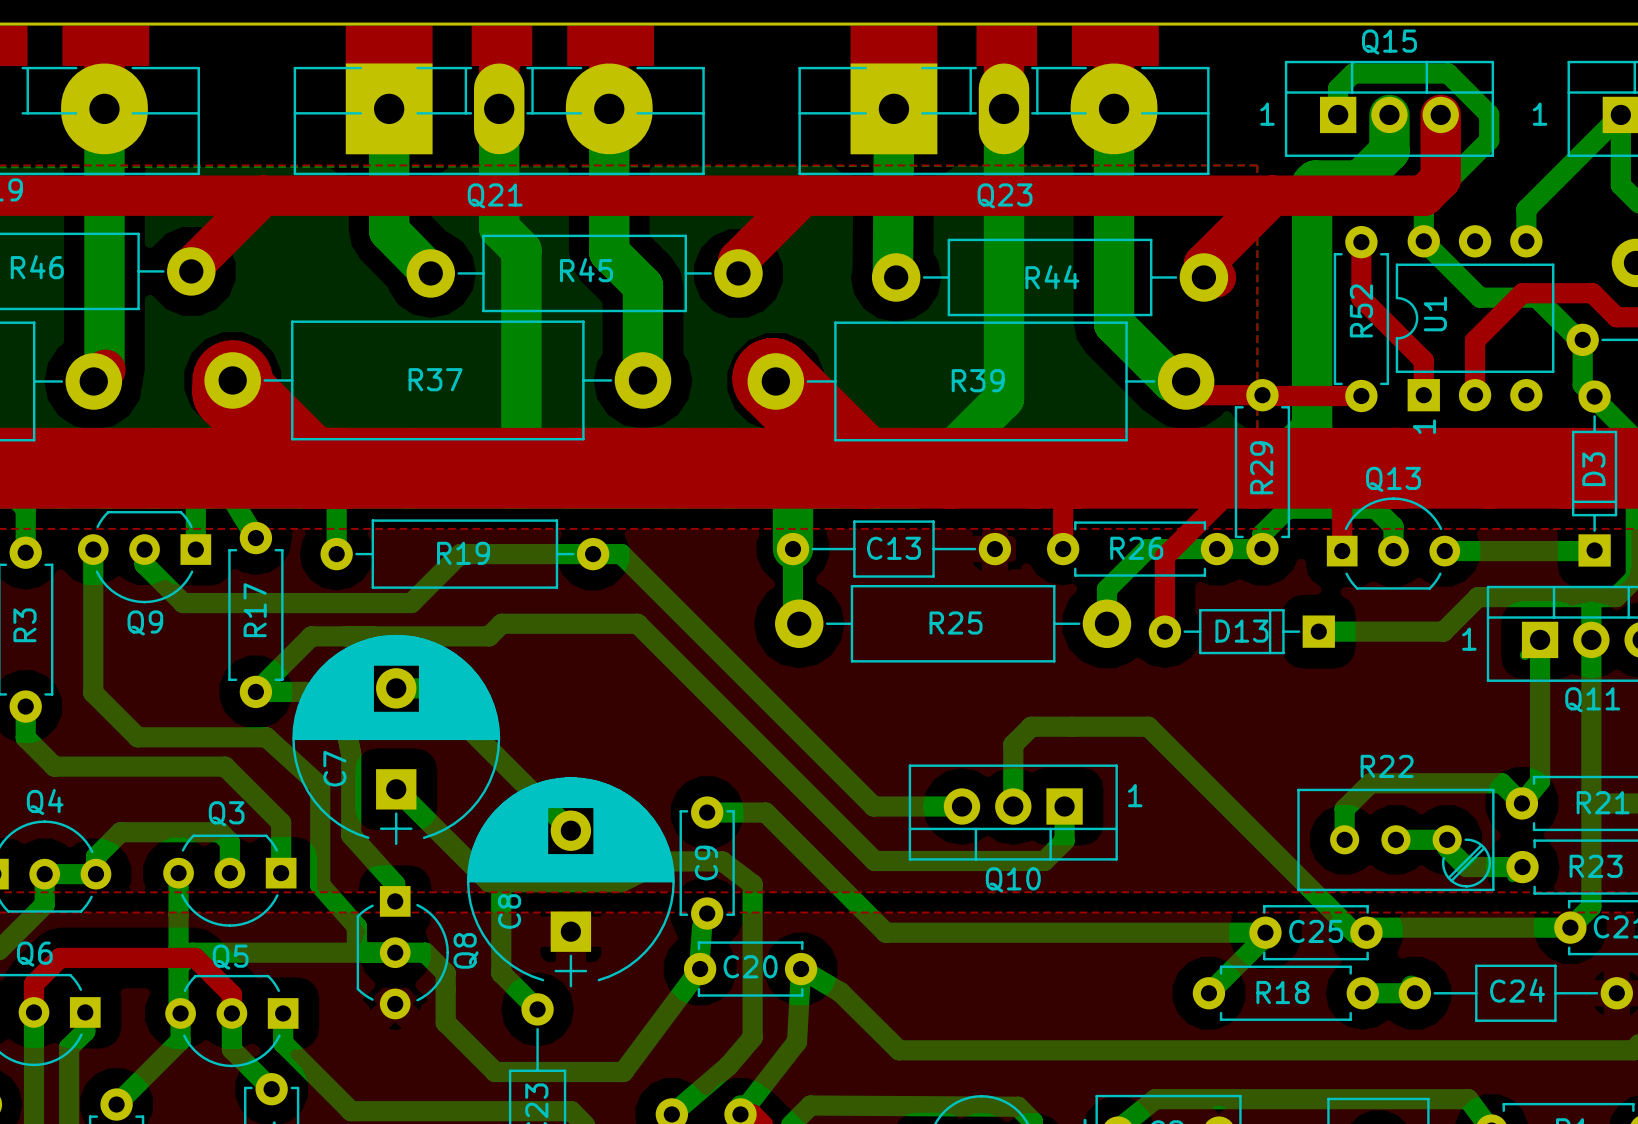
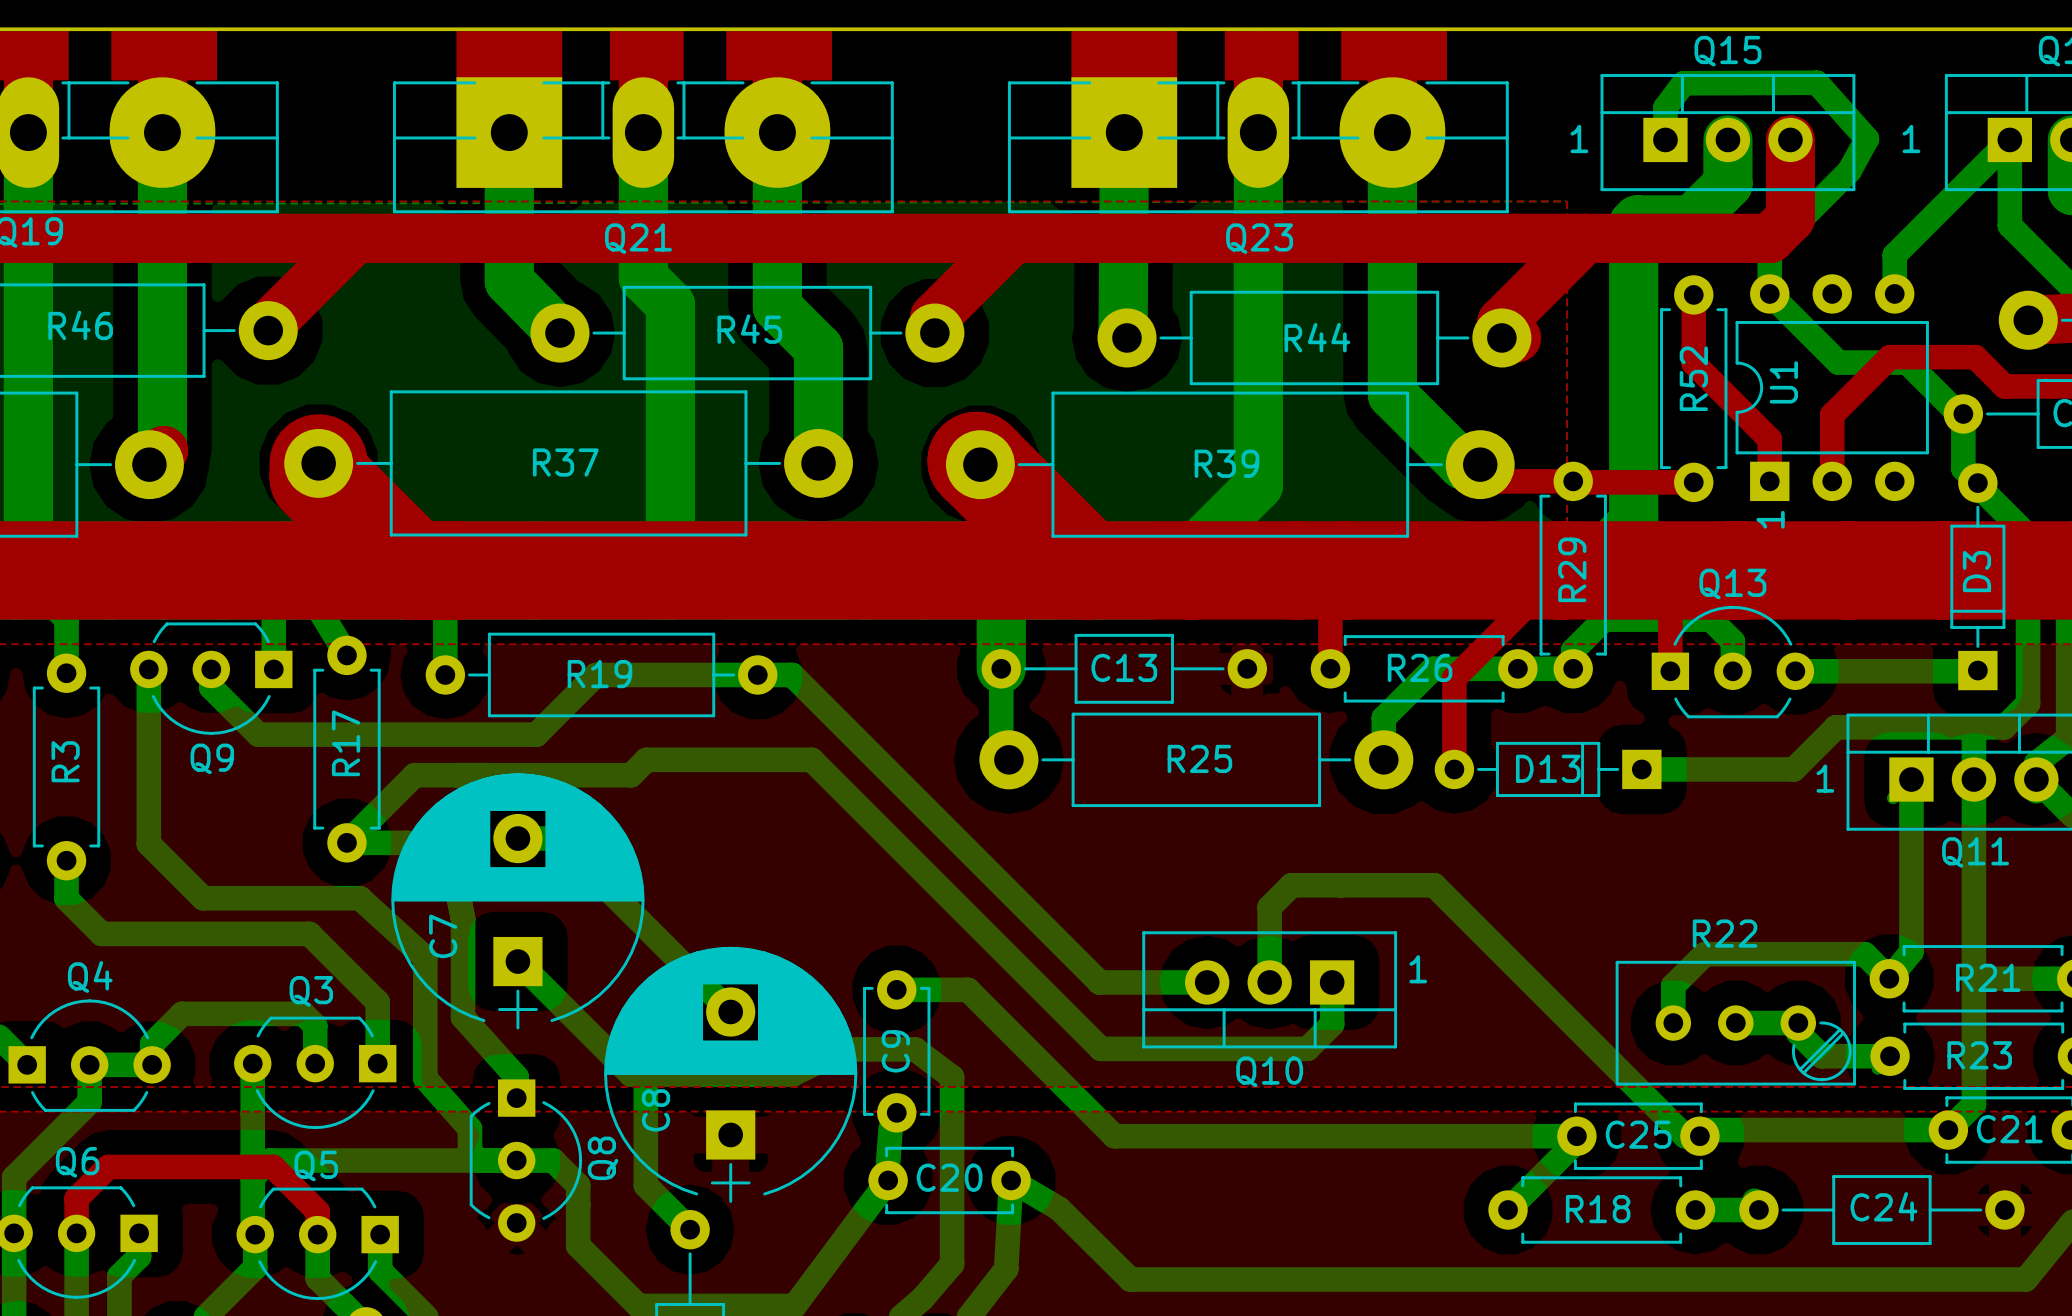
bottom track: (1338, 88) (1353, 73) (1448, 73) (1489, 114) (1489, 140) -> (1665, 107) (1683, 83) (1817, 82) (1866, 138) (1849, 170)

